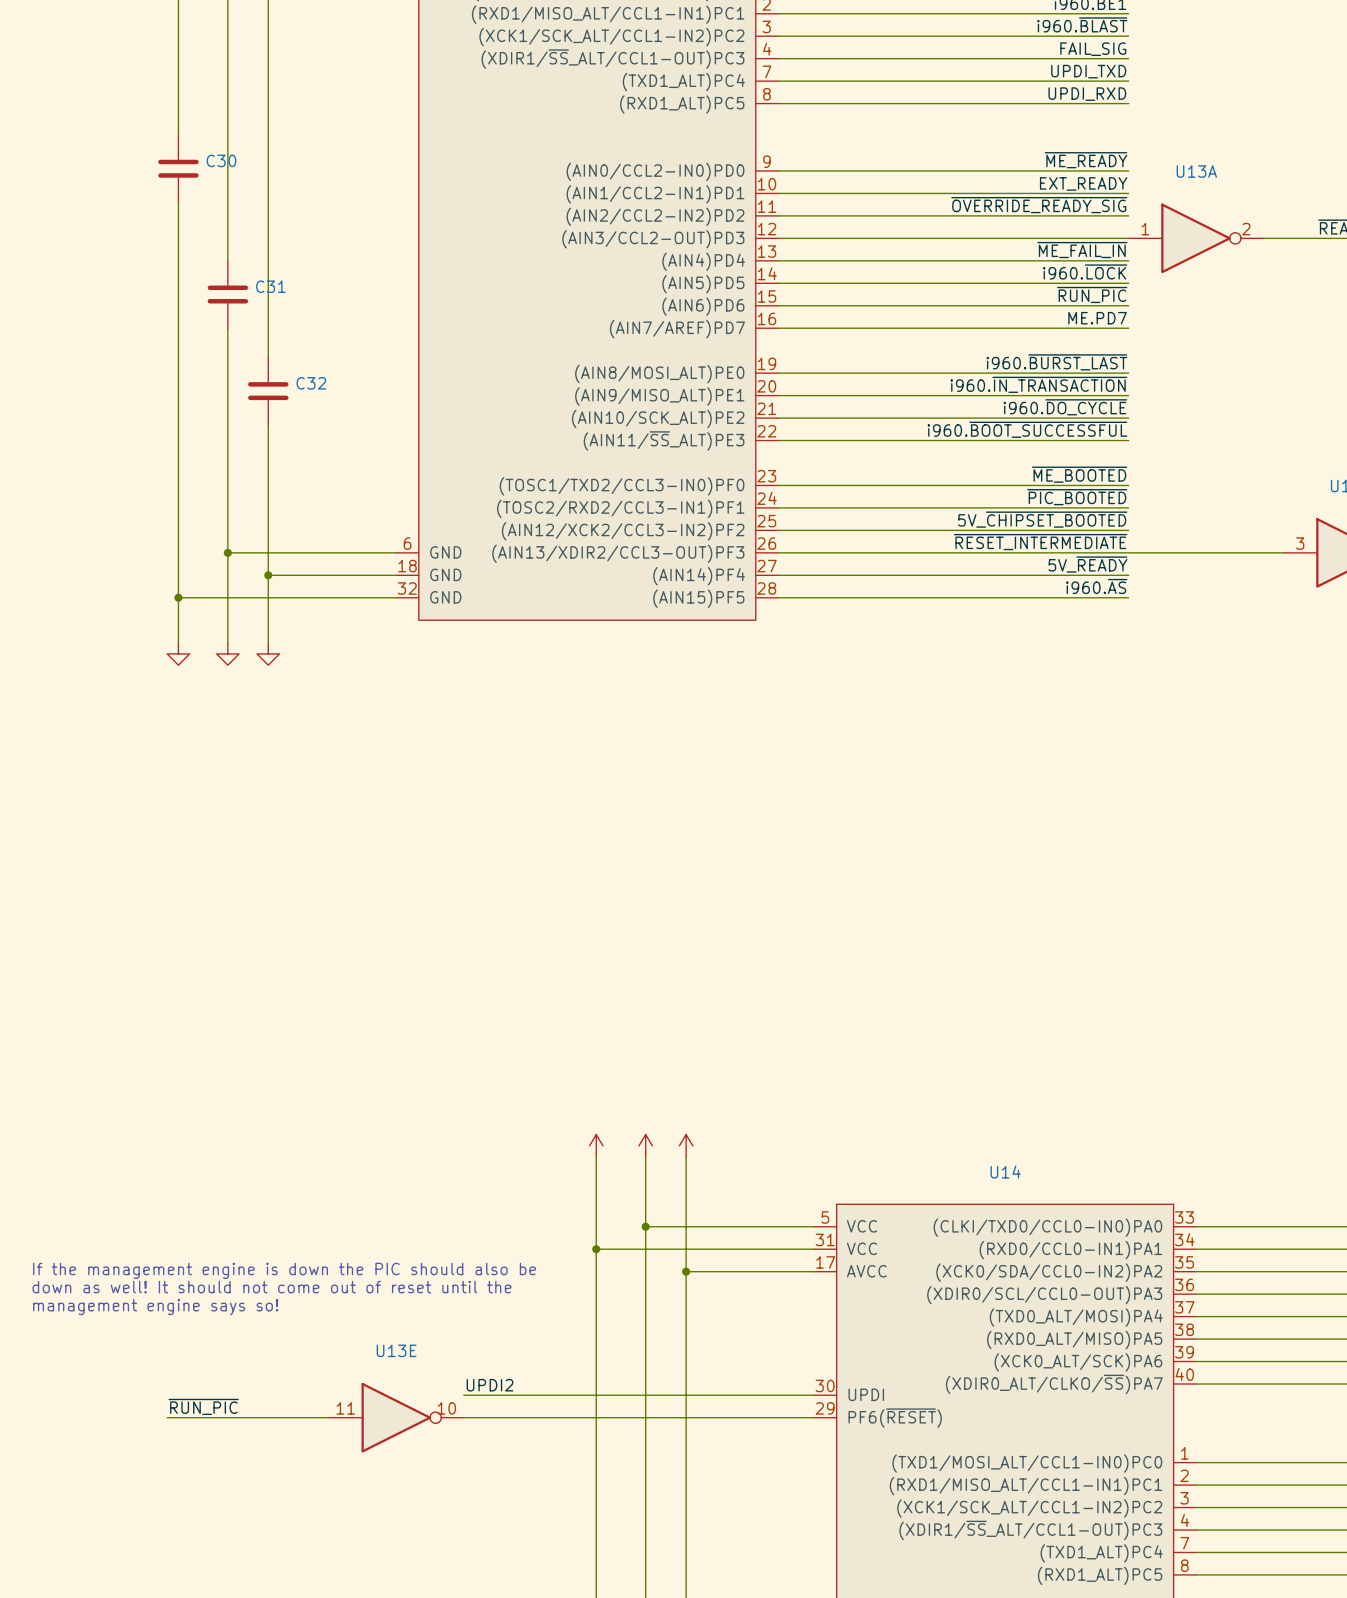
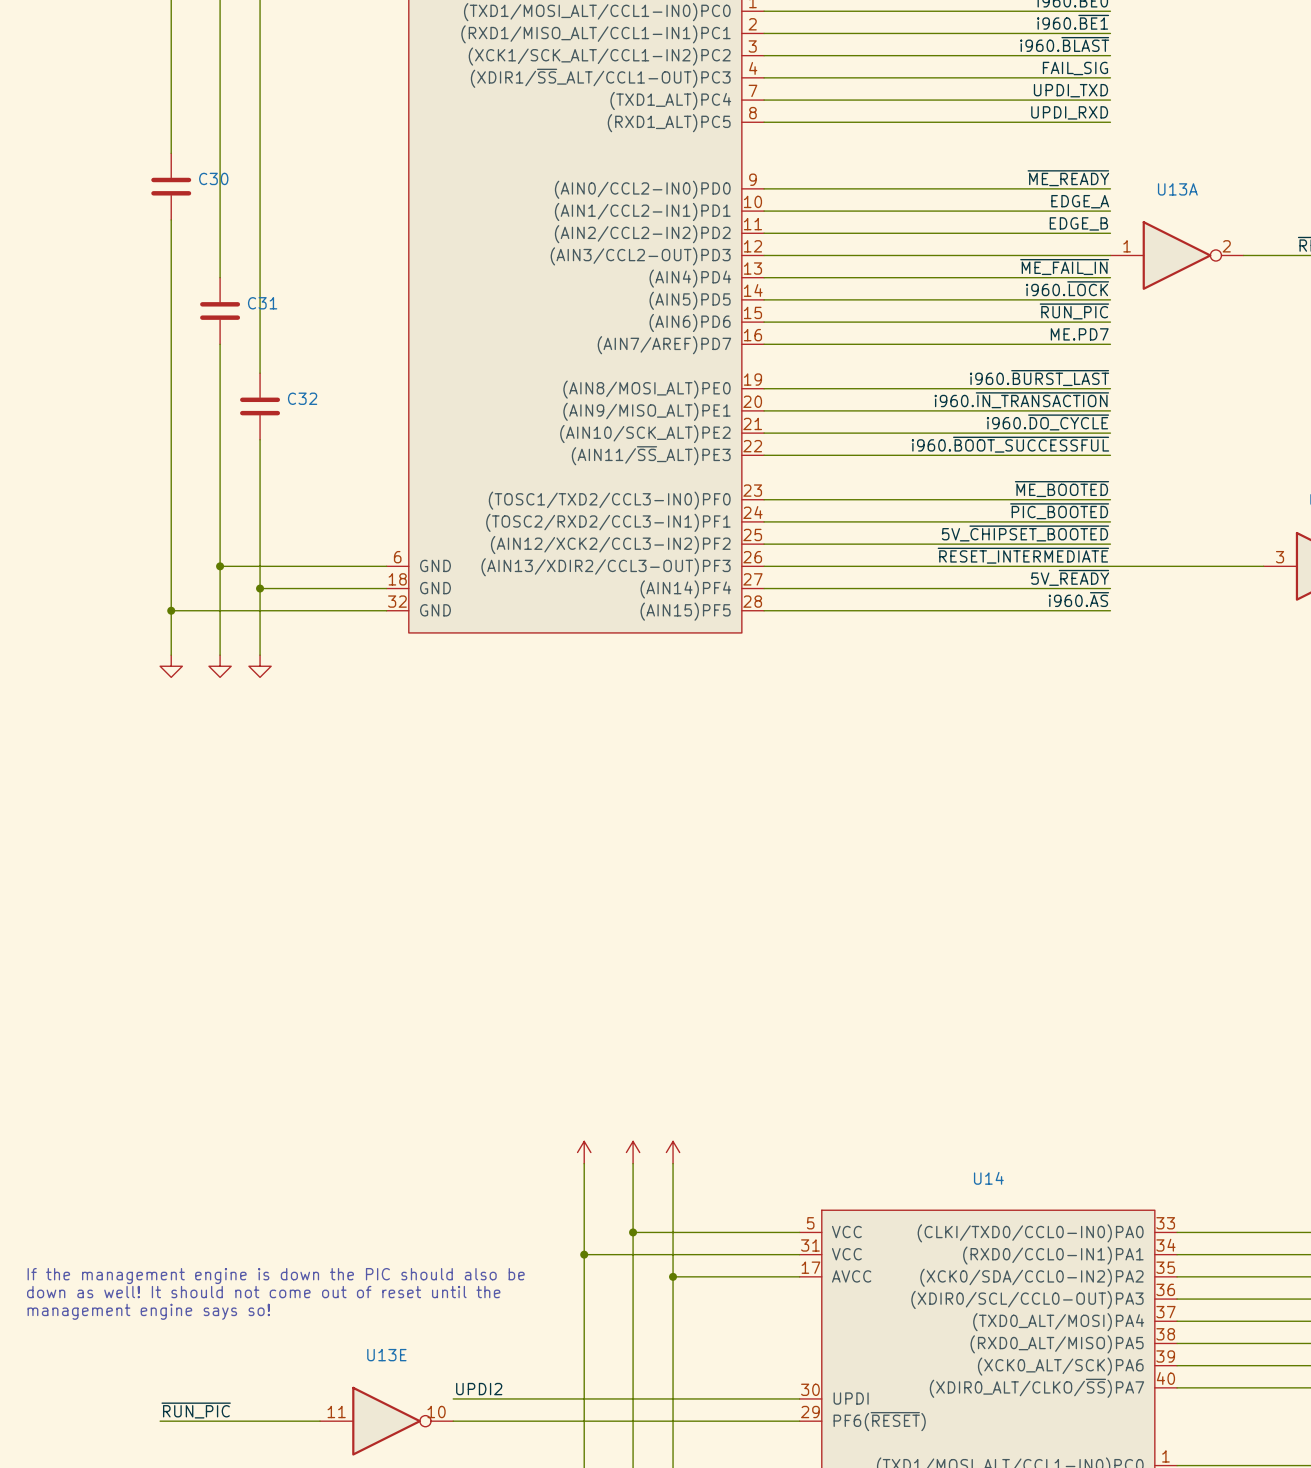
label: EXT_READY (1083, 183) -> EDGE_A (1080, 201)
label: ~{OVERRIDE_READY_SIG} (1039, 205) -> EDGE_B (1078, 223)

